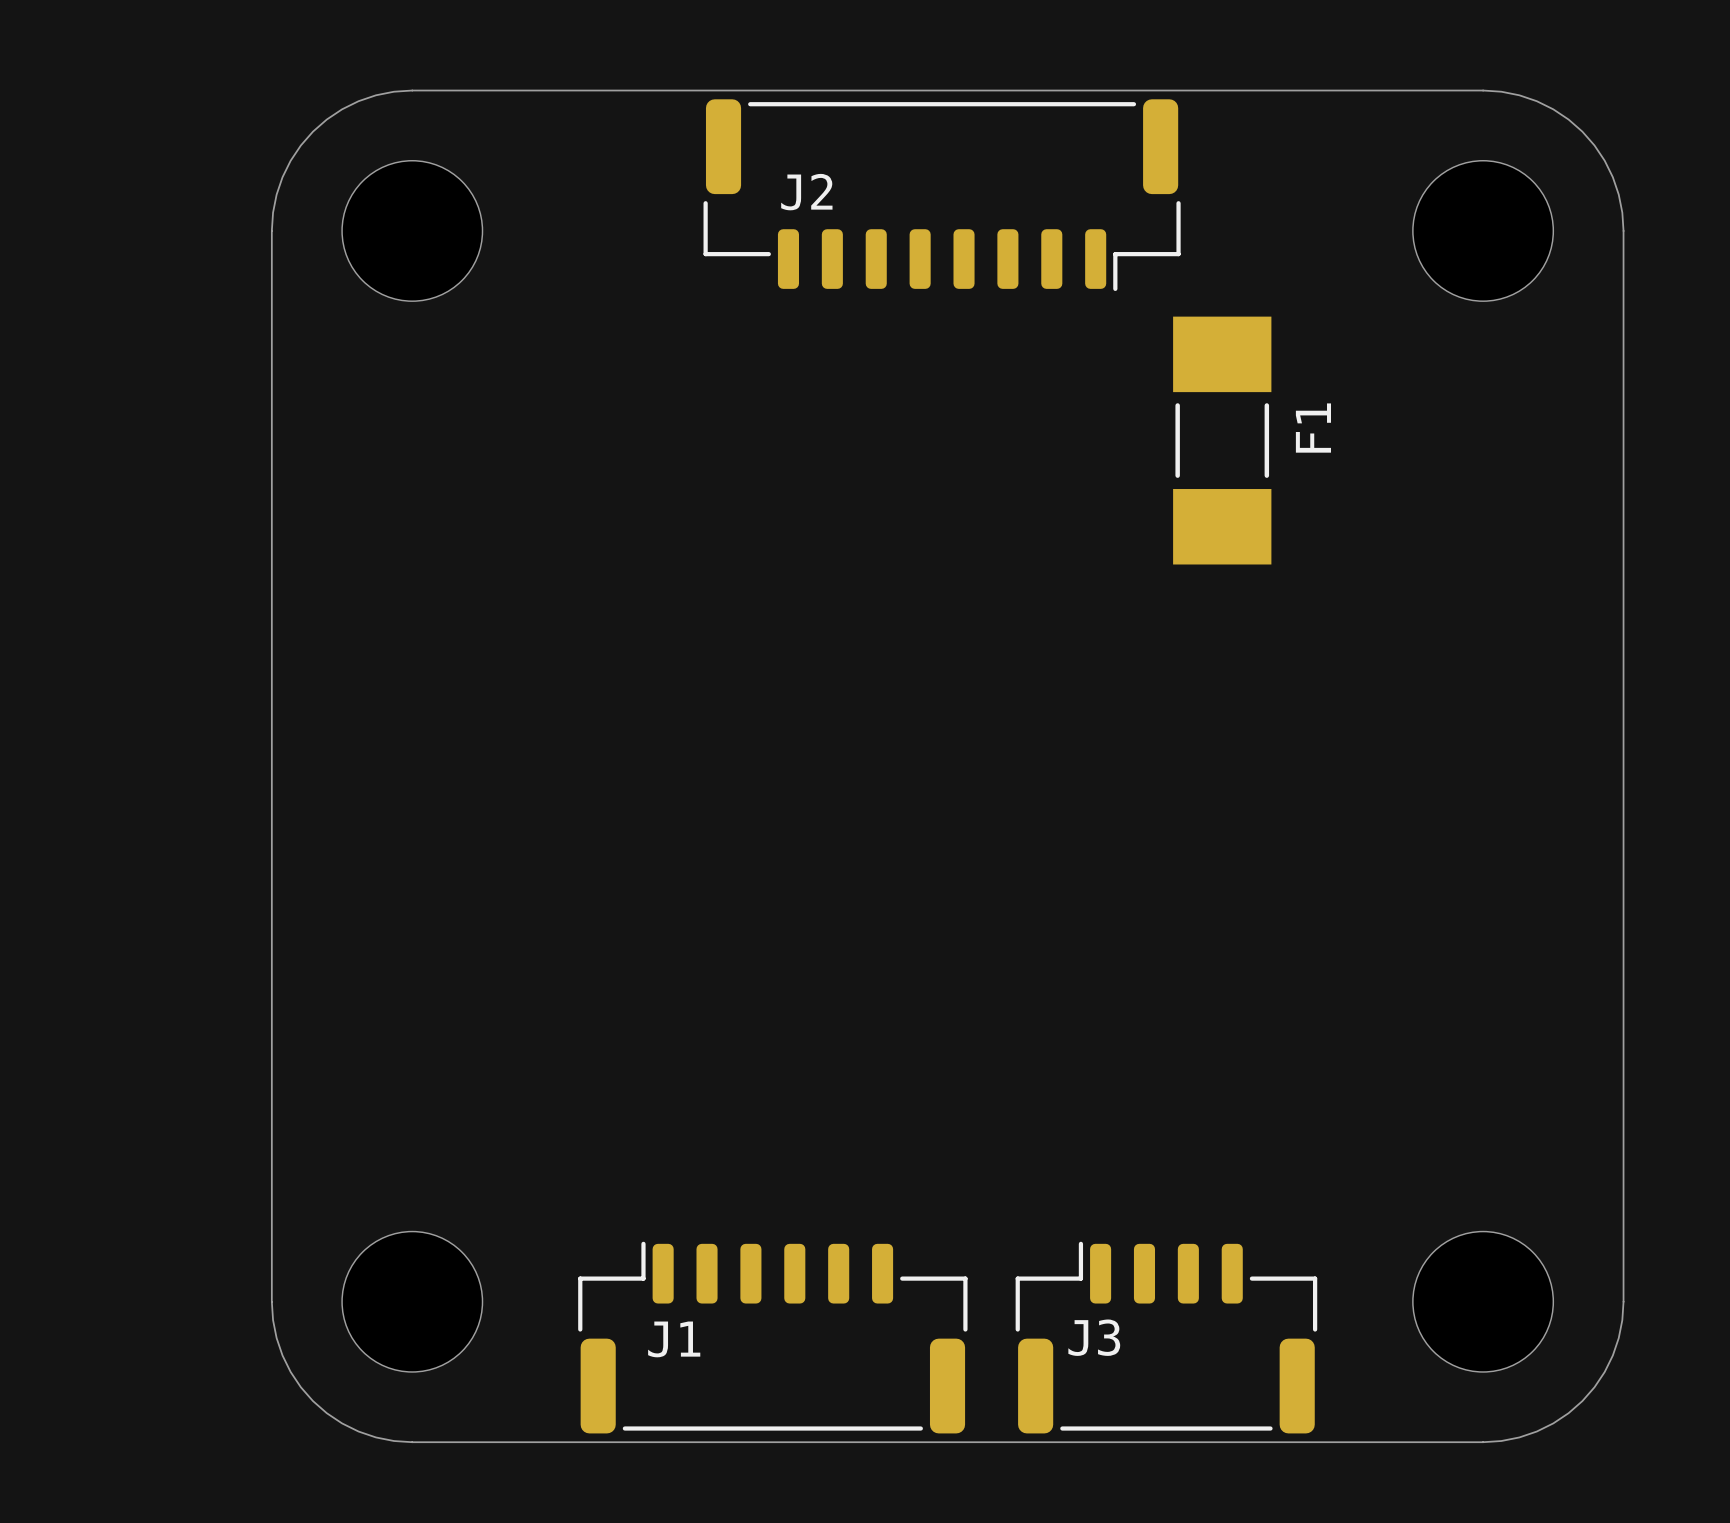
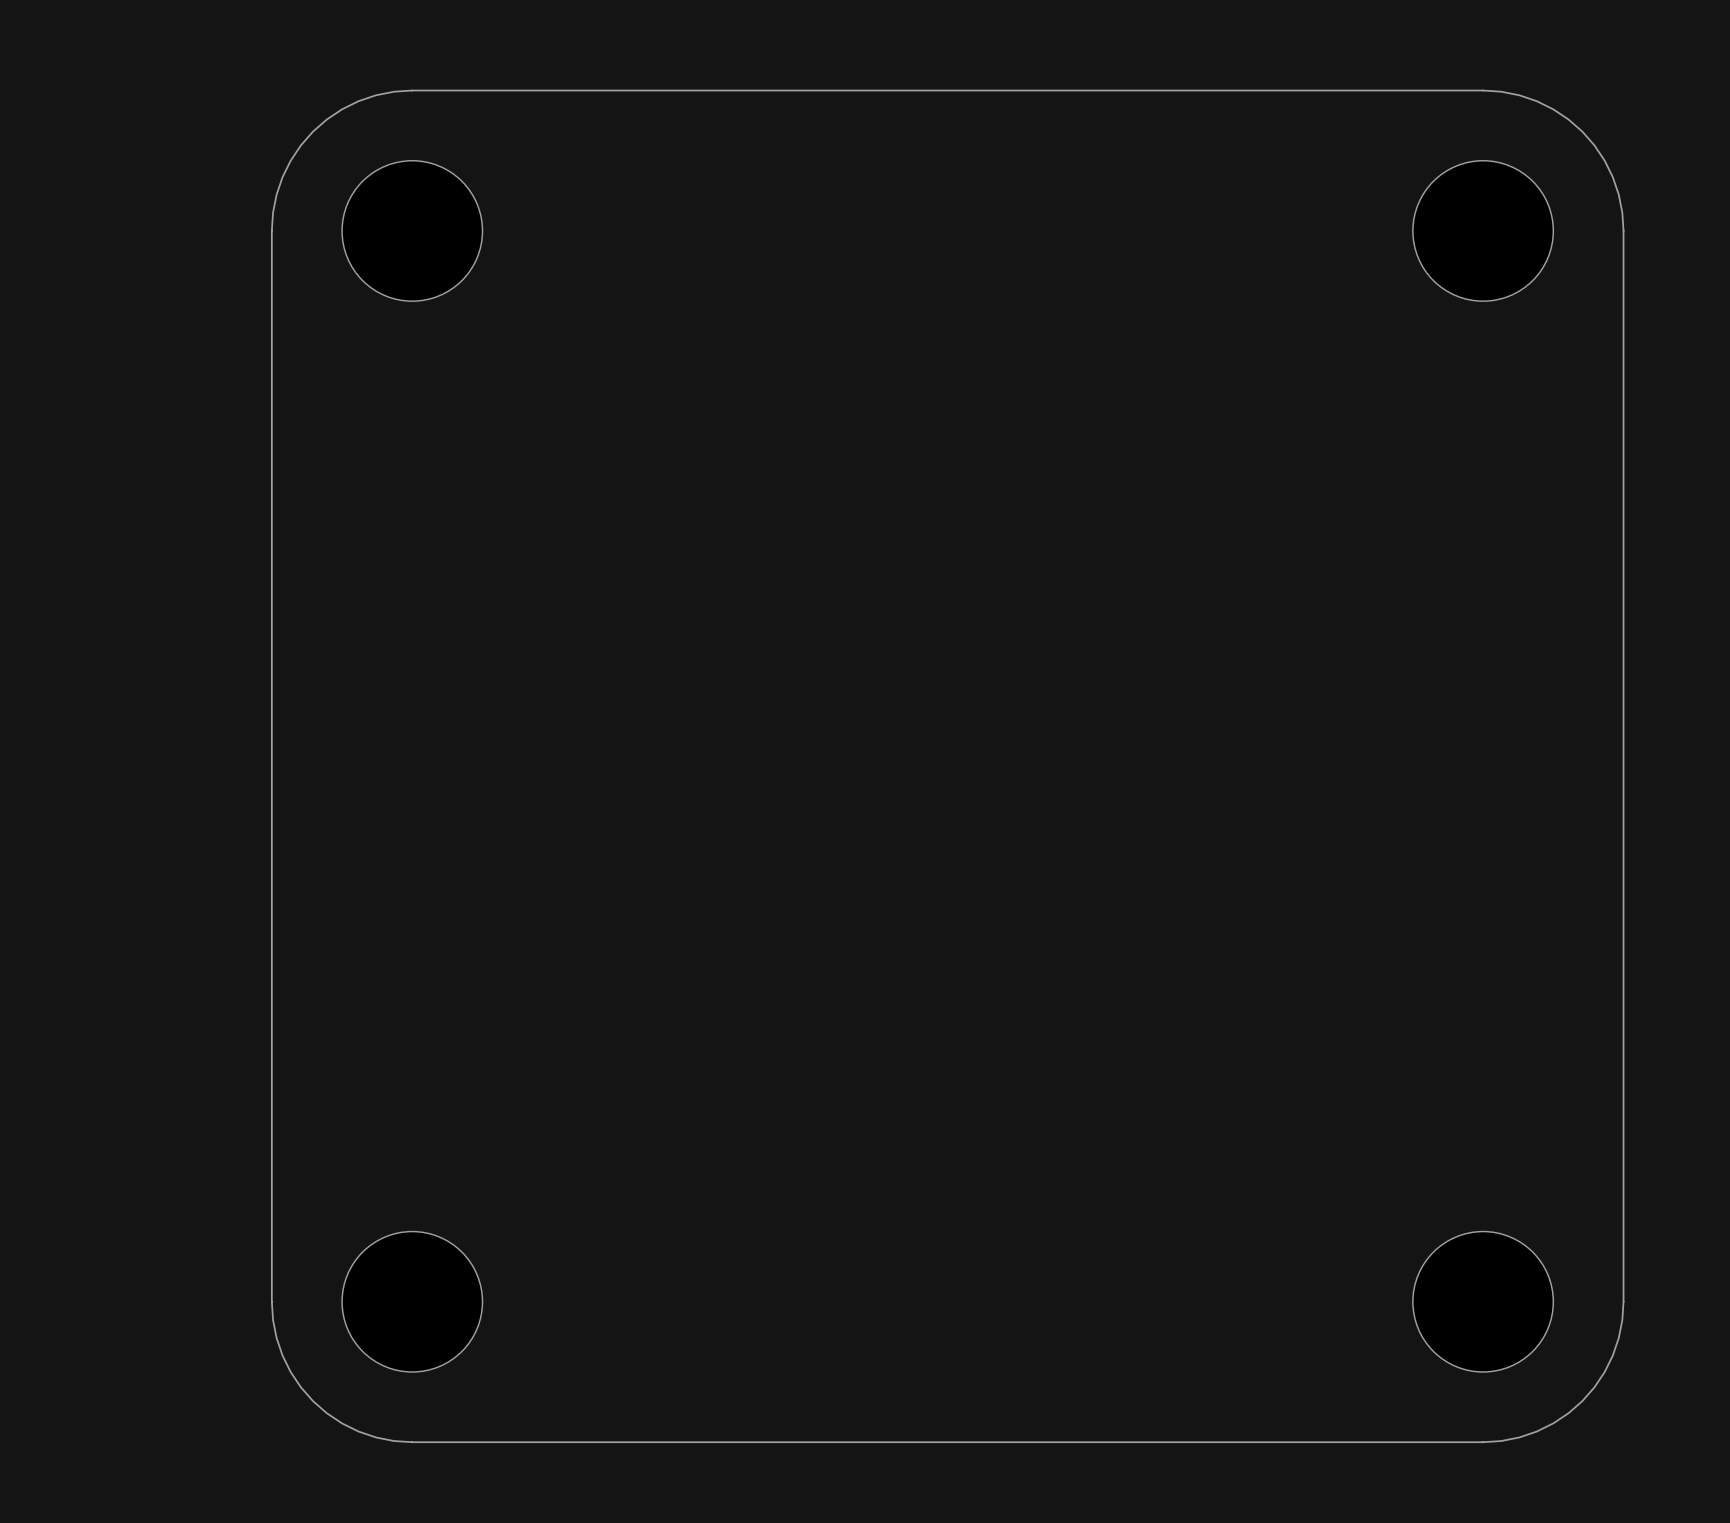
J2: (942, 195) -> none
F1: (1222, 440) -> none
J1: (772, 1337) -> none
J3: (1166, 1337) -> none

